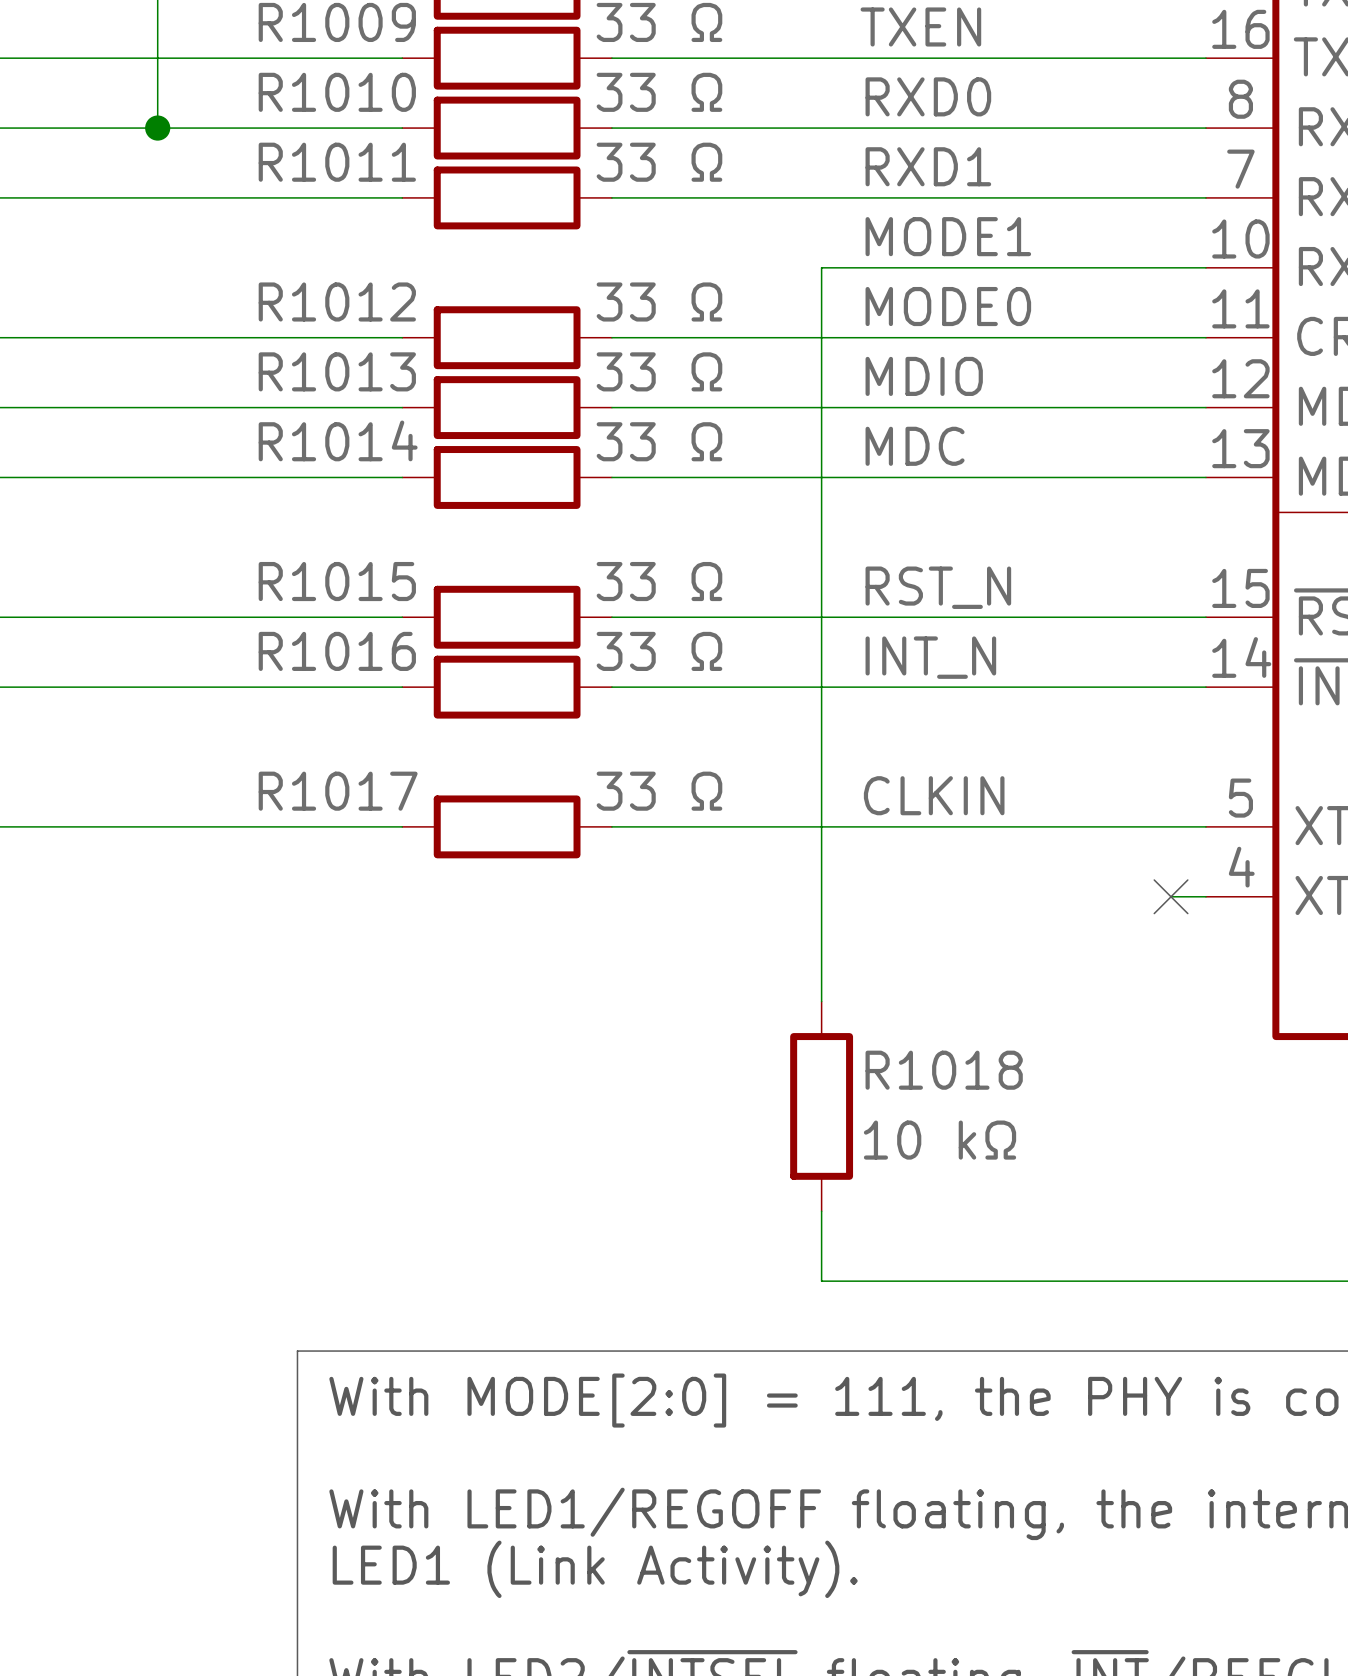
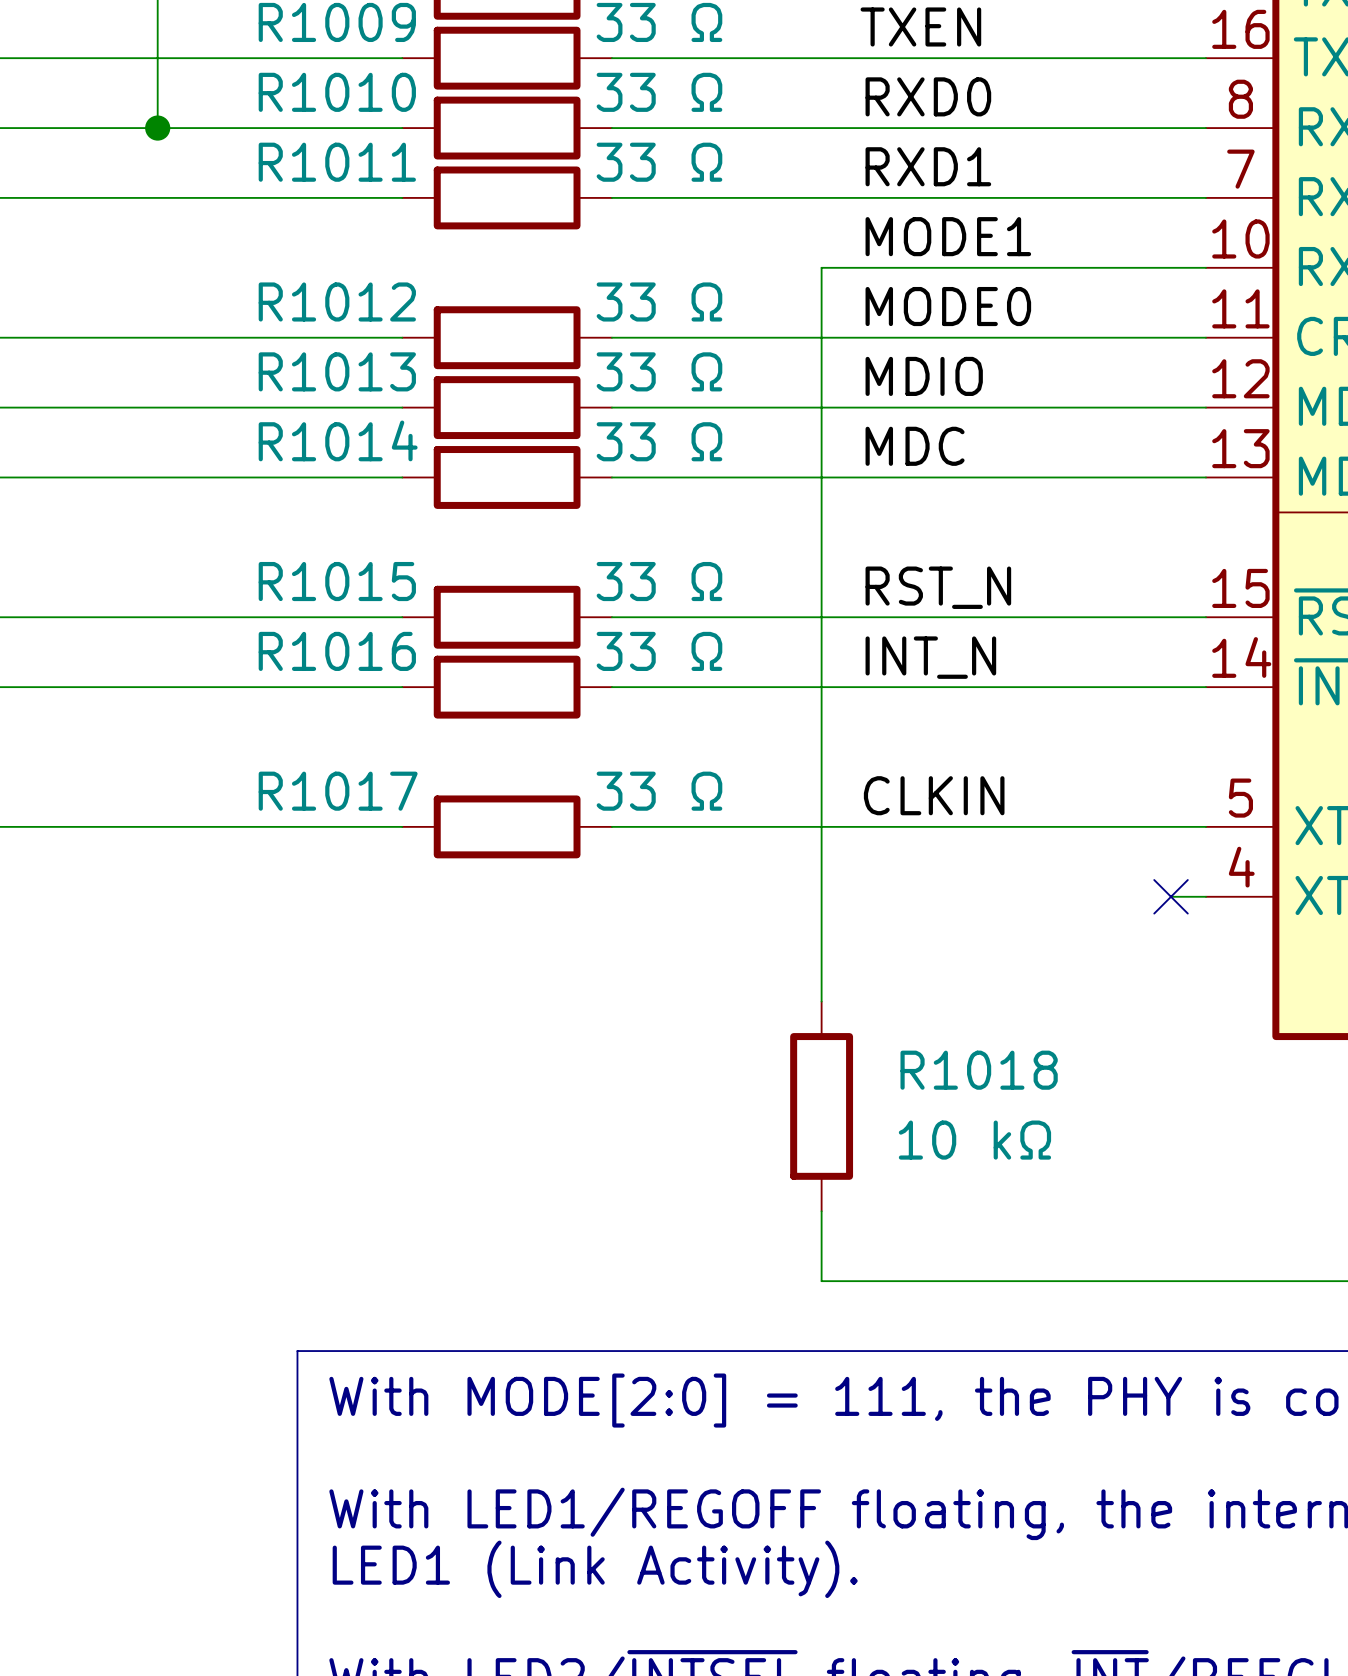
R1018 name position: R1018 (944, 1070) -> R1018 (979, 1070)
R1018 value position: 10 kΩ (940, 1140) -> 10 kΩ (974, 1140)

